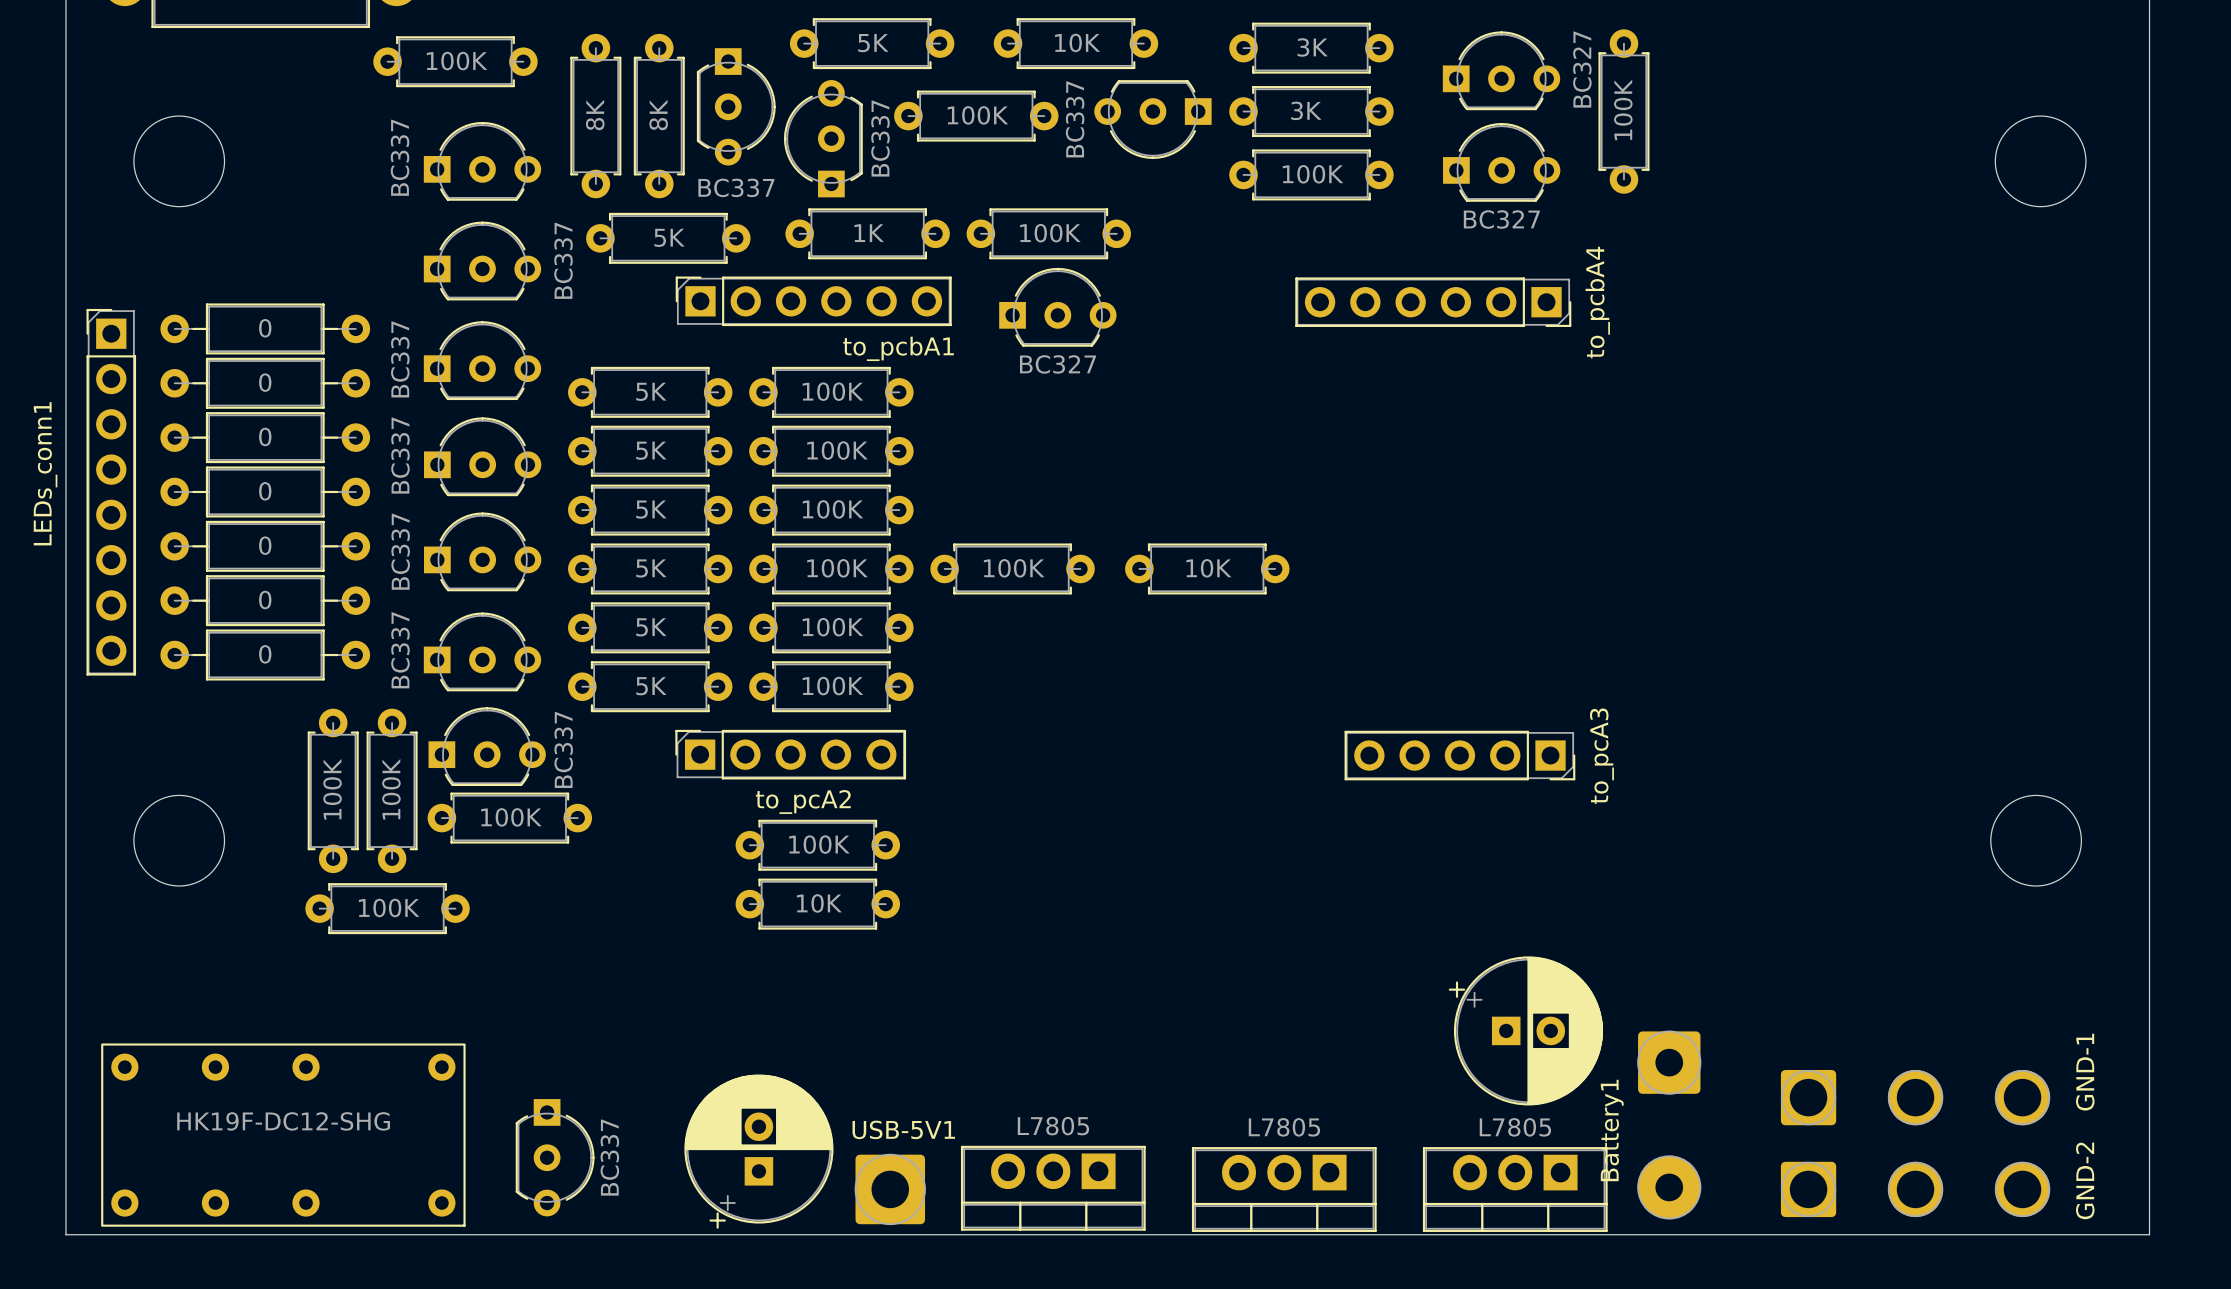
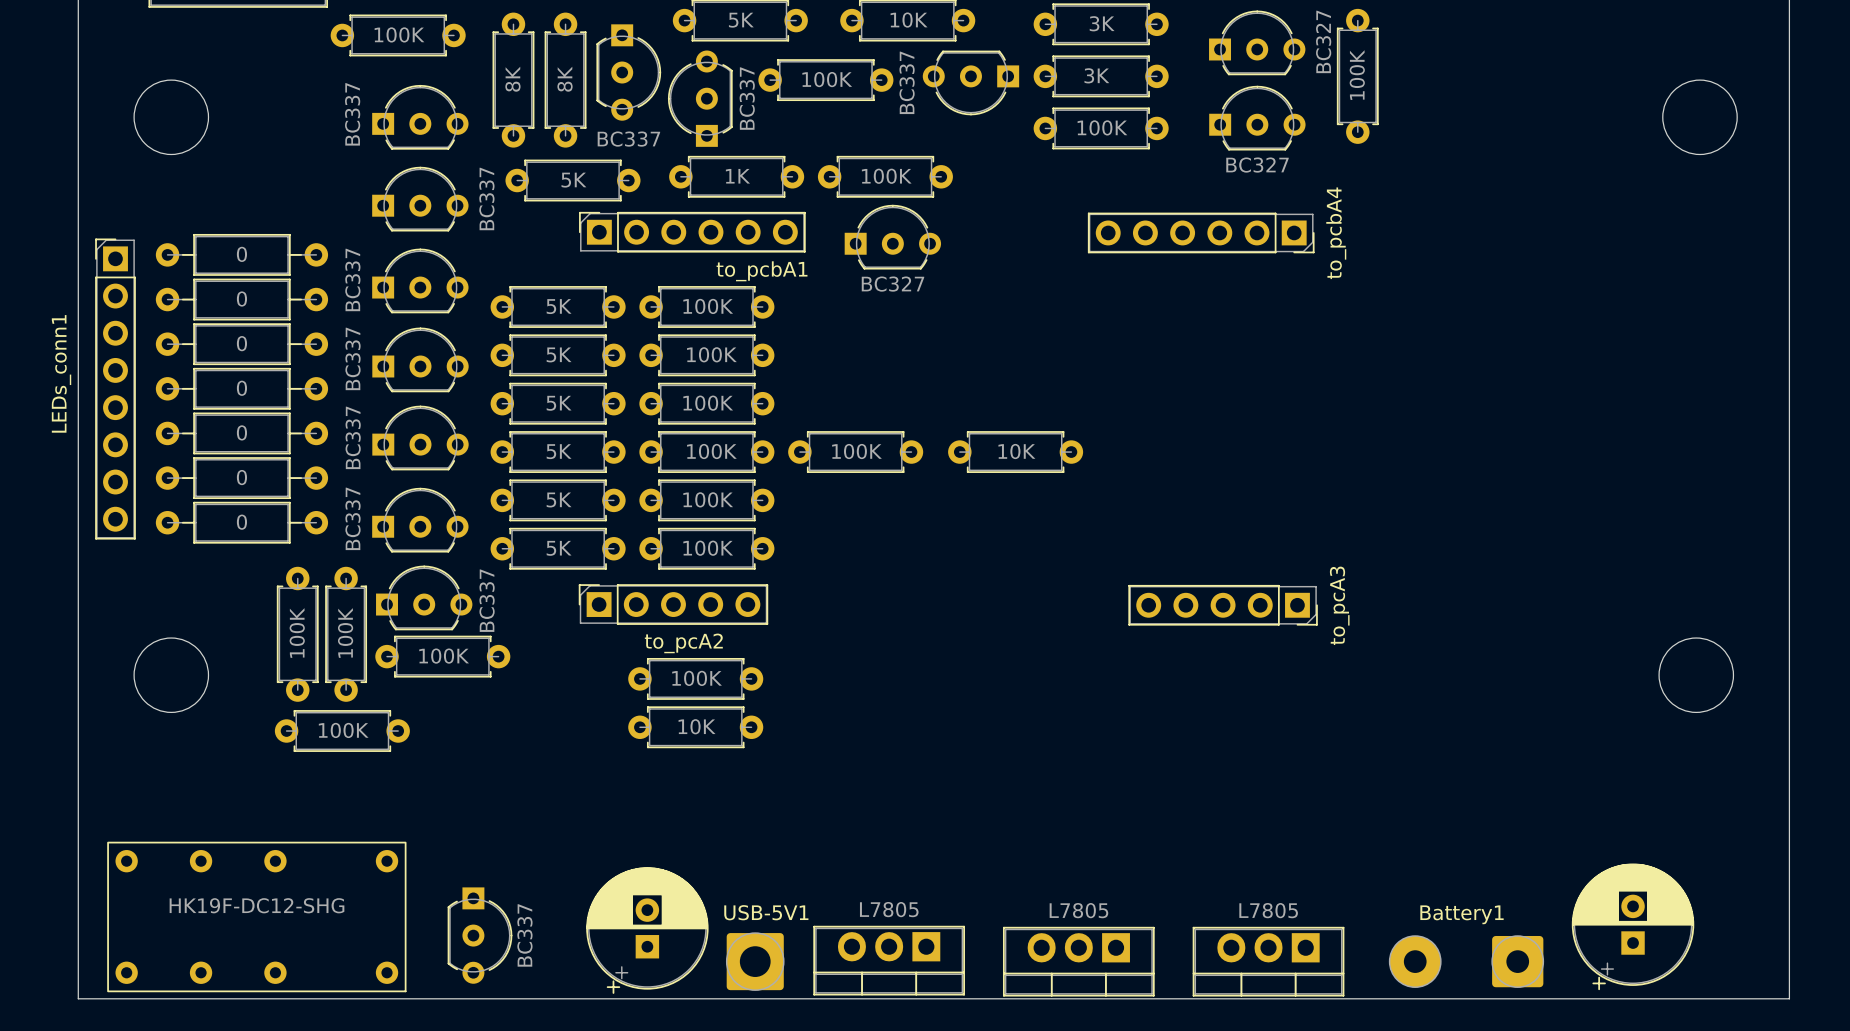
part: (1525, 1030) -> none
GND-1: (1915, 1097) -> none
Battery1 rotation: 0° (1669, 1125) -> 90° clockwise (1466, 961)
part: none -> (1633, 926)
GND-2: (1915, 1189) -> none

